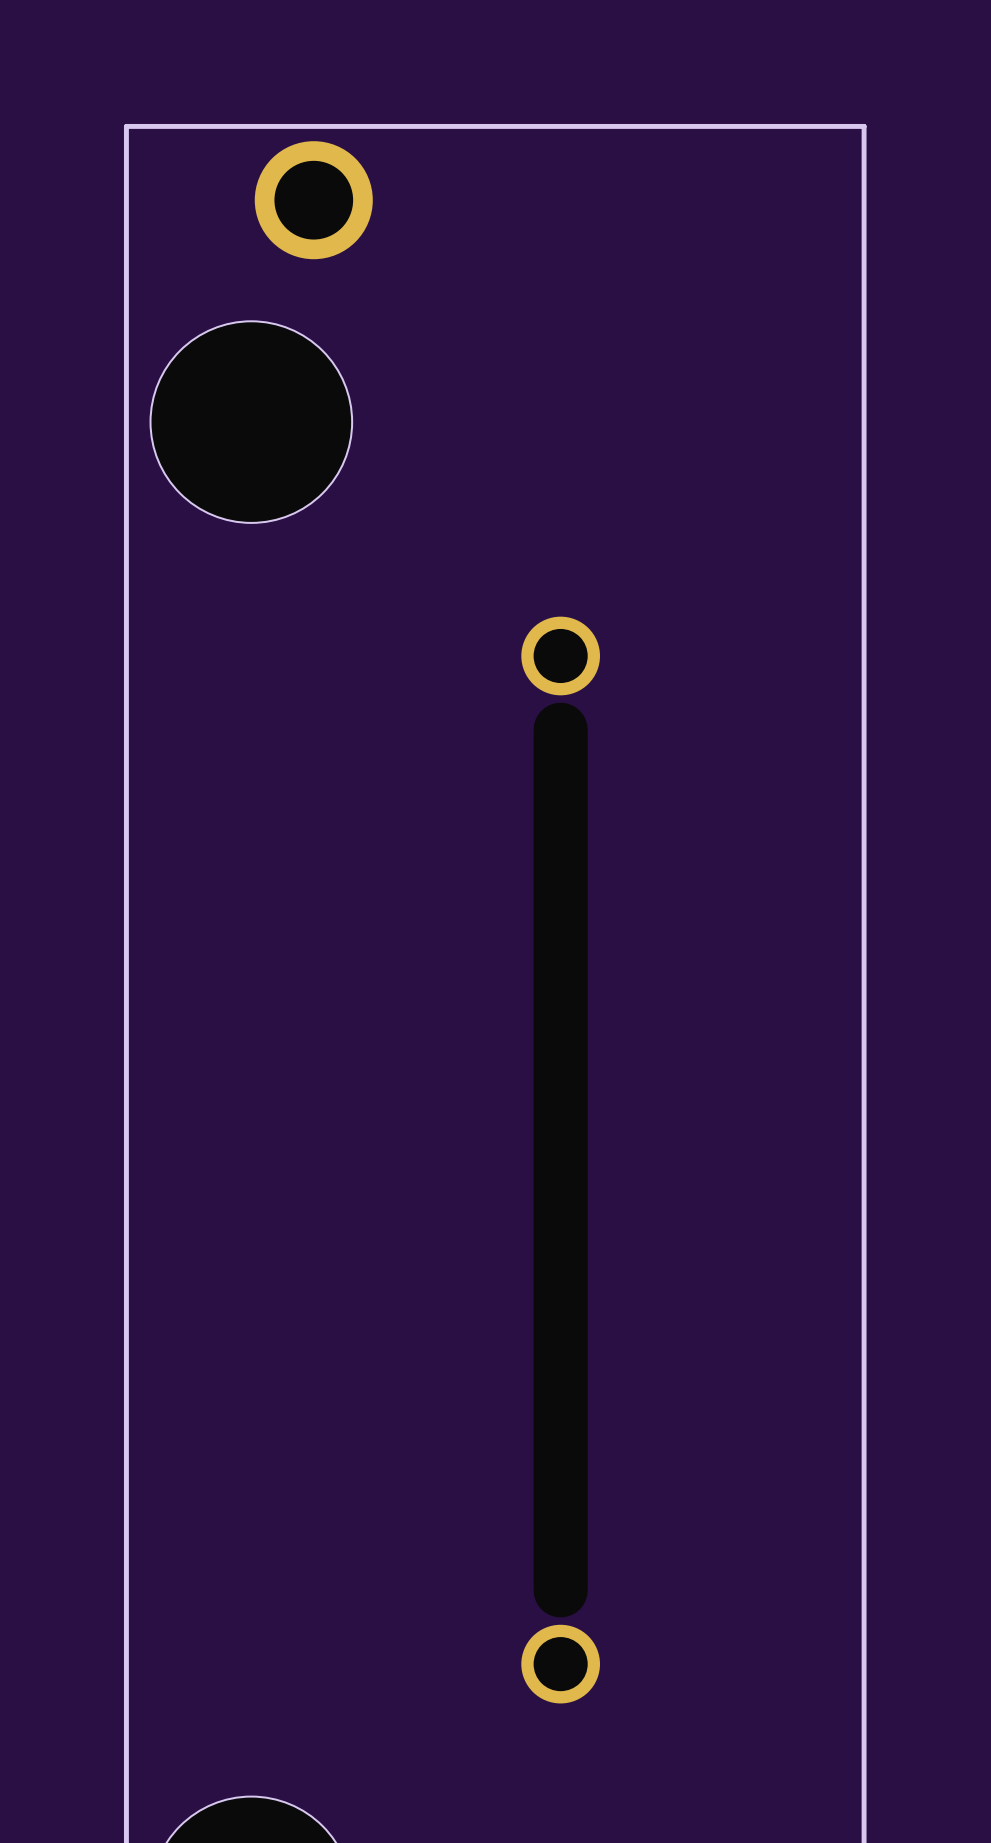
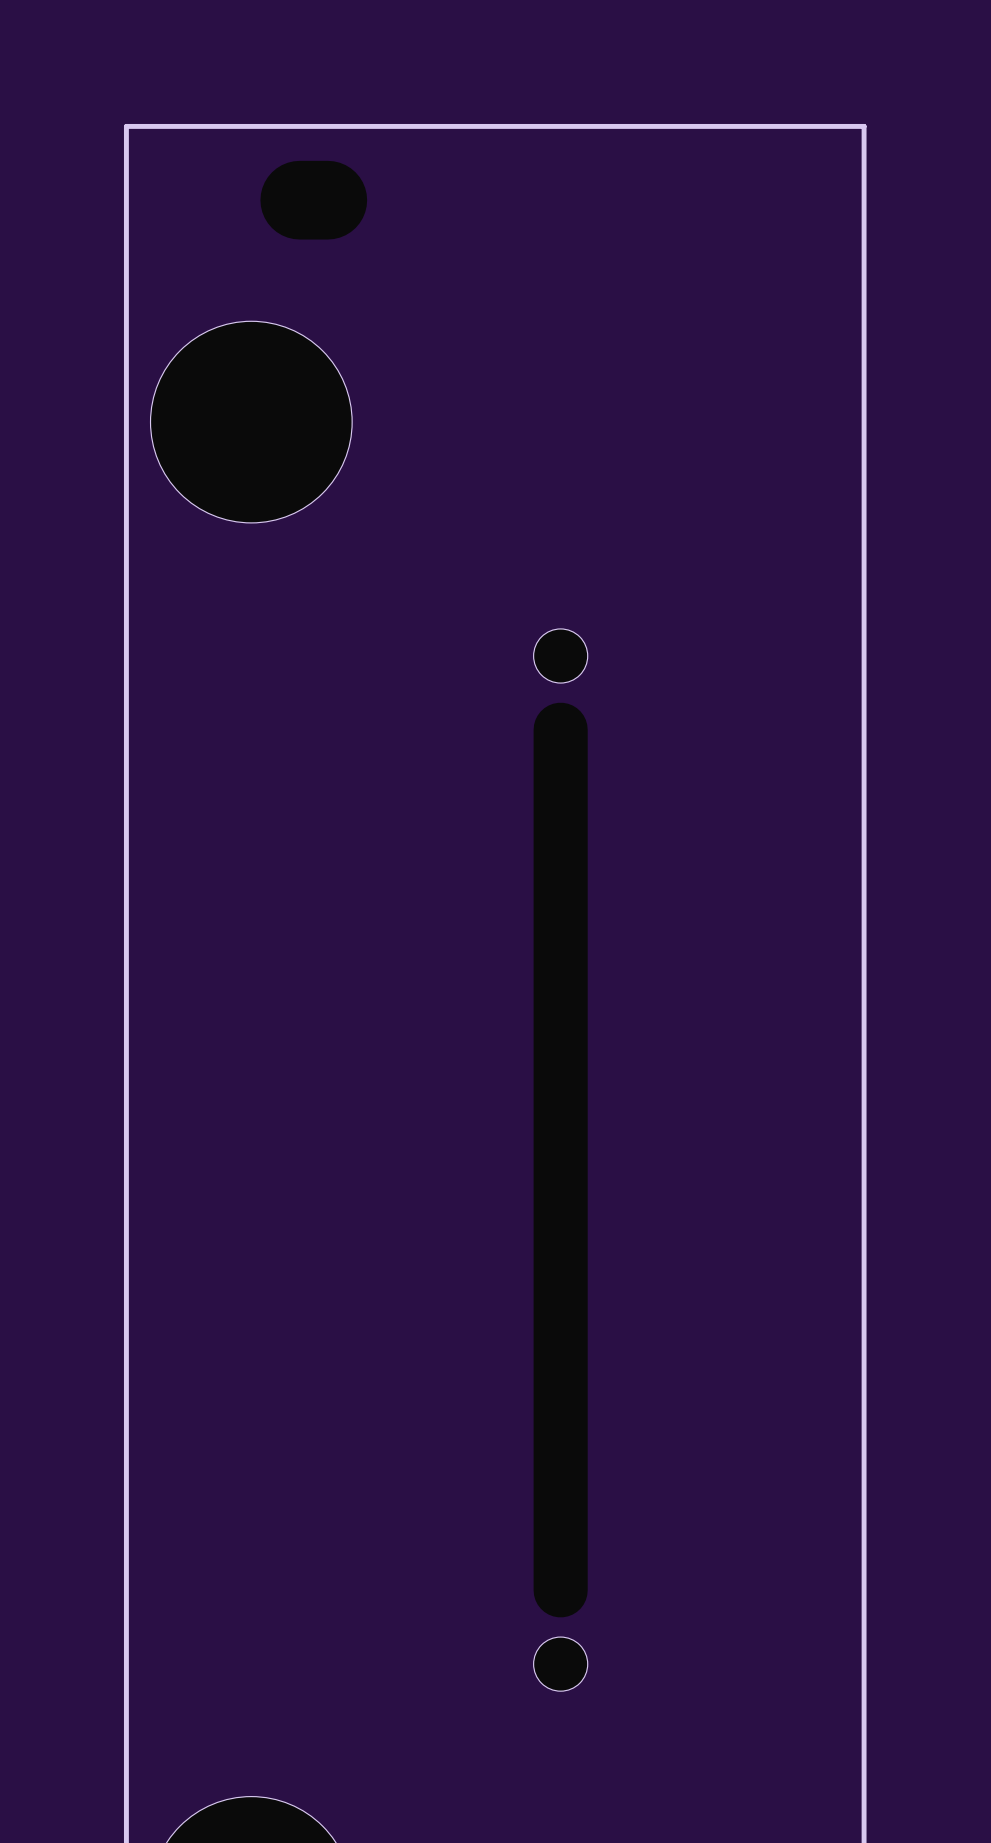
part footprint: [254, 141, 373, 260] -> [260, 160, 368, 240]
part footprint: [521, 616, 600, 1704] -> [533, 628, 588, 1692]

